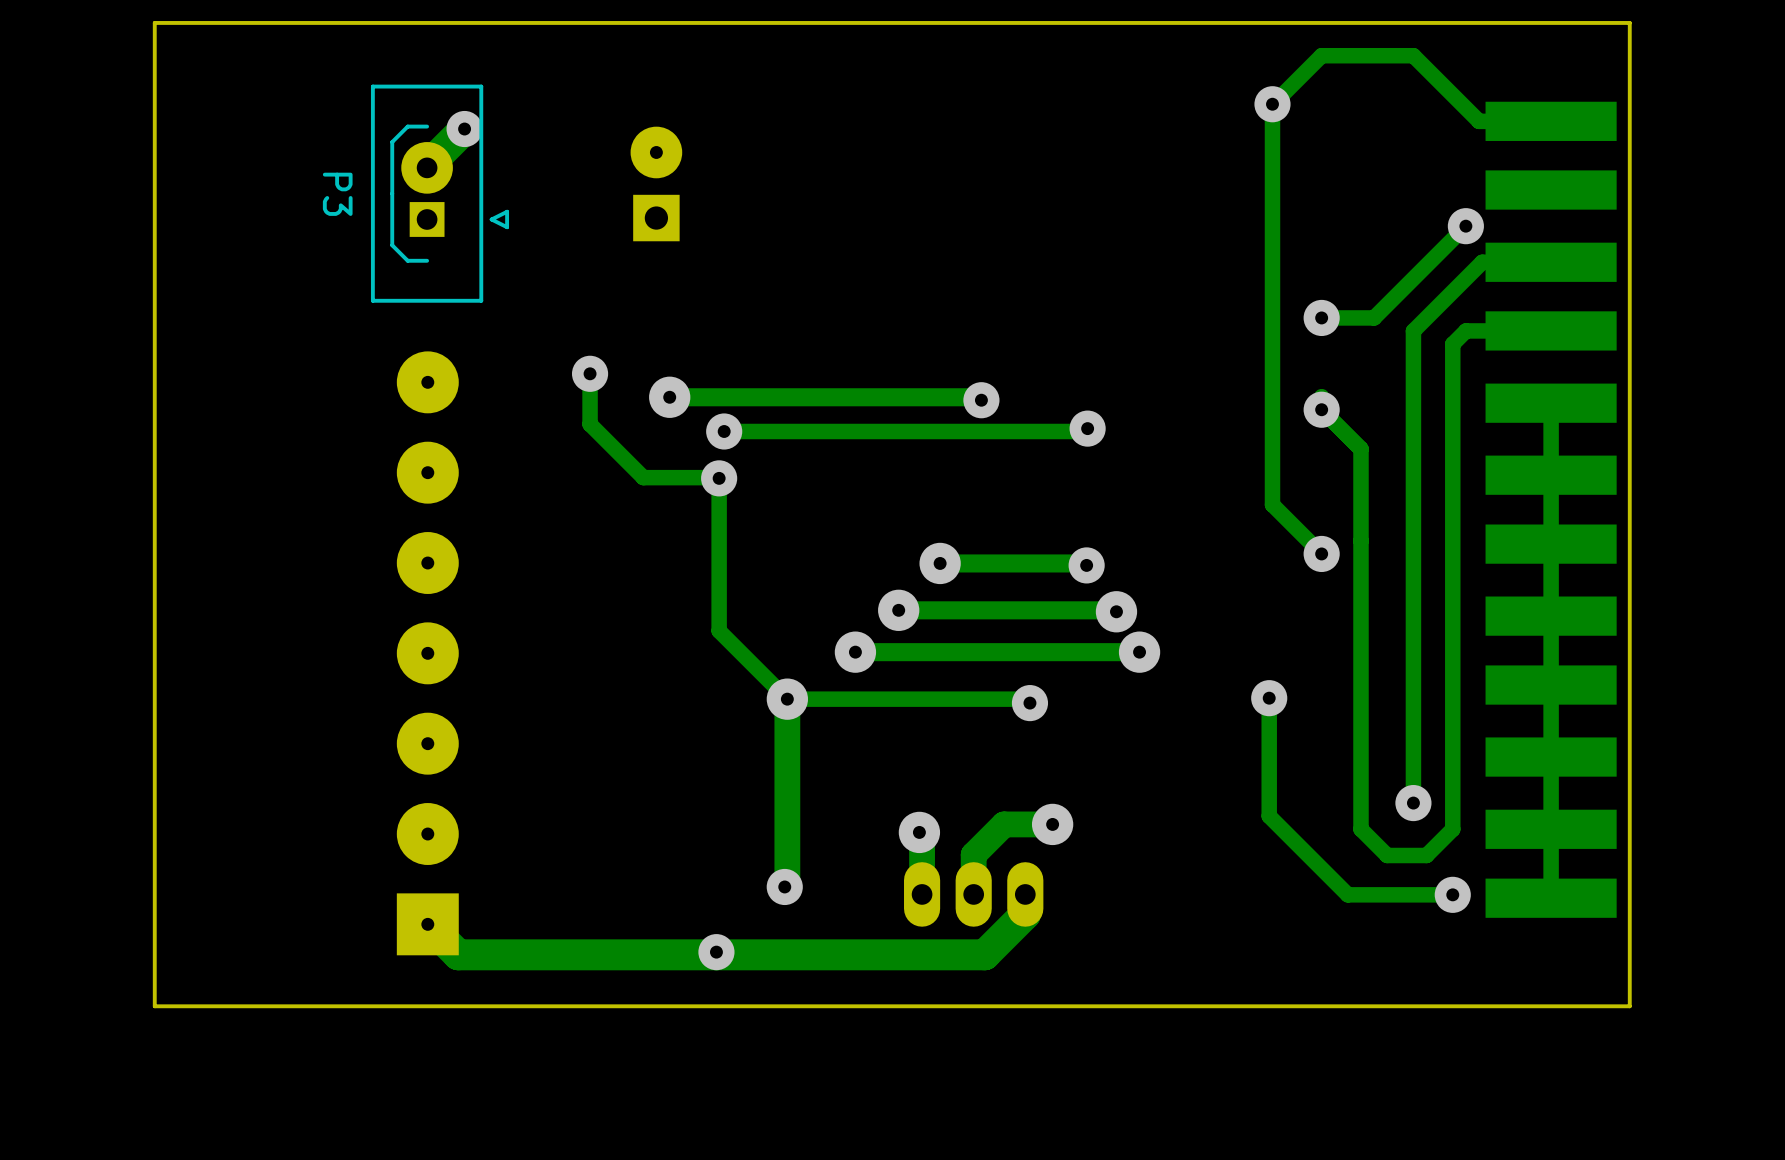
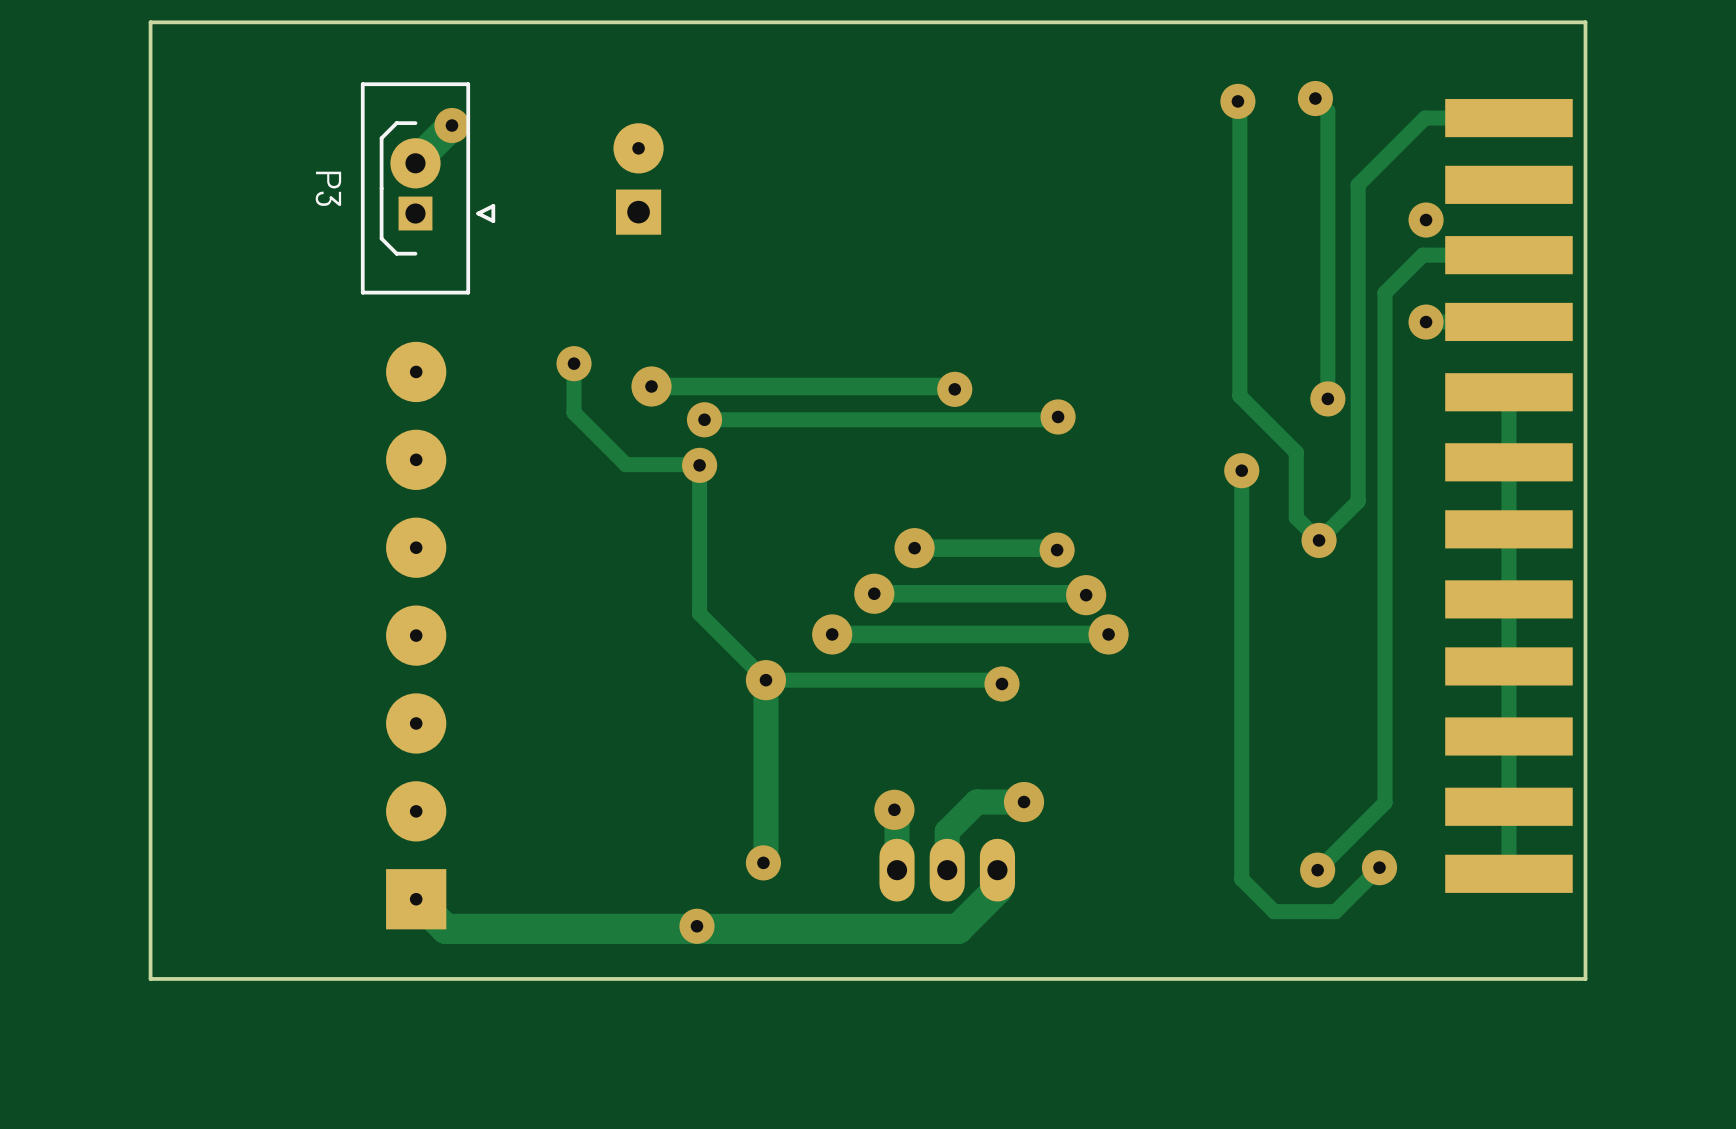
track: none -> (1315, 98) (1327, 110) (1327, 398)
via: none -> (1315, 98)
track: (1479, 121) (1413, 55) (1321, 55) (1272, 104) (1272, 504) (1321, 553) -> (1438, 118) (1425, 118) (1358, 184) (1358, 501) (1319, 540) (1296, 517) (1296, 452) (1239, 396) (1239, 103) (1237, 101)
track: (1465, 226) (1374, 317) (1321, 317) -> none
track: (1482, 262) (1413, 331) (1413, 803) -> (1441, 255) (1422, 255) (1384, 292) (1384, 802) (1317, 870)
via: (1321, 317) -> none
track: (1465, 331) (1452, 344) (1452, 829) (1426, 855) (1387, 855) (1360, 829) (1360, 449) (1321, 409) (1321, 396) -> none
via: none -> (1426, 322)
via: (1321, 409) -> none
via: none -> (1327, 398)
track: none -> (1241, 470) (1241, 879) (1274, 911) (1335, 911) (1379, 867)
via: none -> (1241, 470)
via position: (1321, 553) -> (1319, 540)
track: (1269, 698) (1269, 816) (1347, 894) (1452, 894) -> none
via: (1269, 698) -> none
via: (1413, 803) -> none
via: none -> (1317, 870)
via position: (1452, 894) -> (1379, 867)

